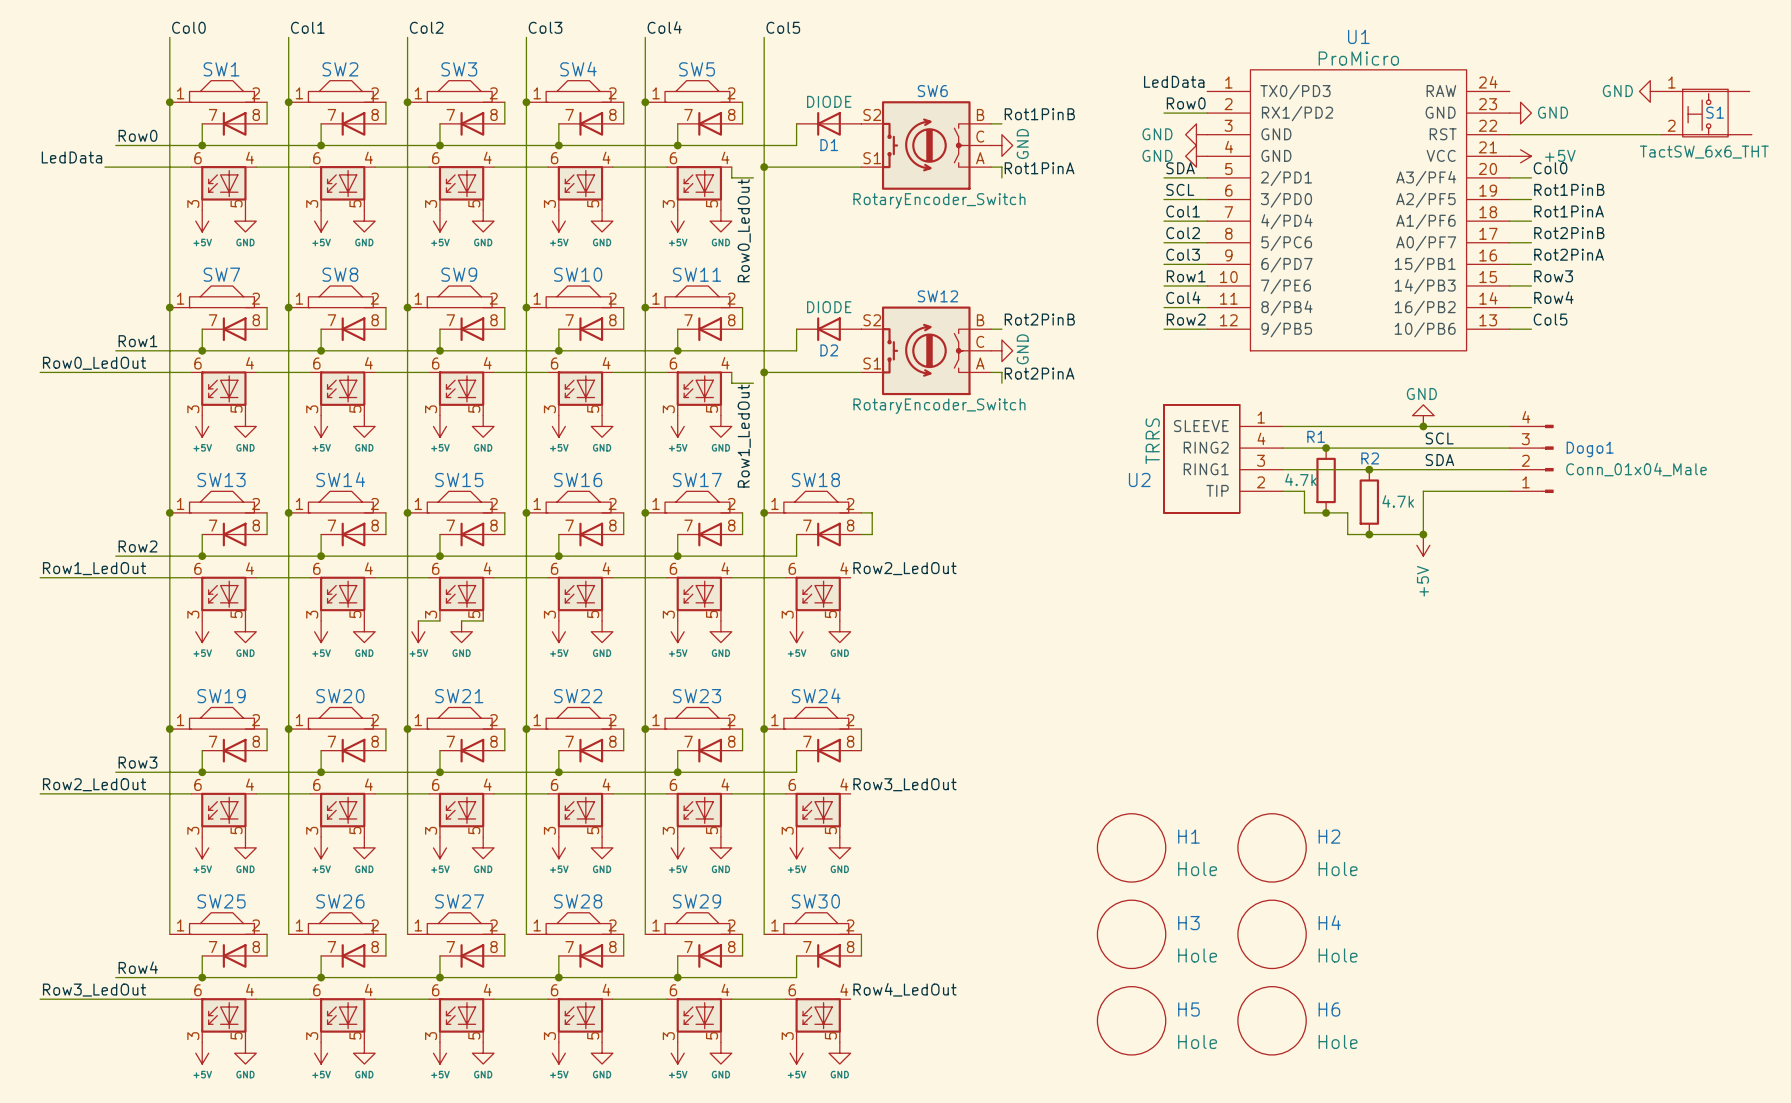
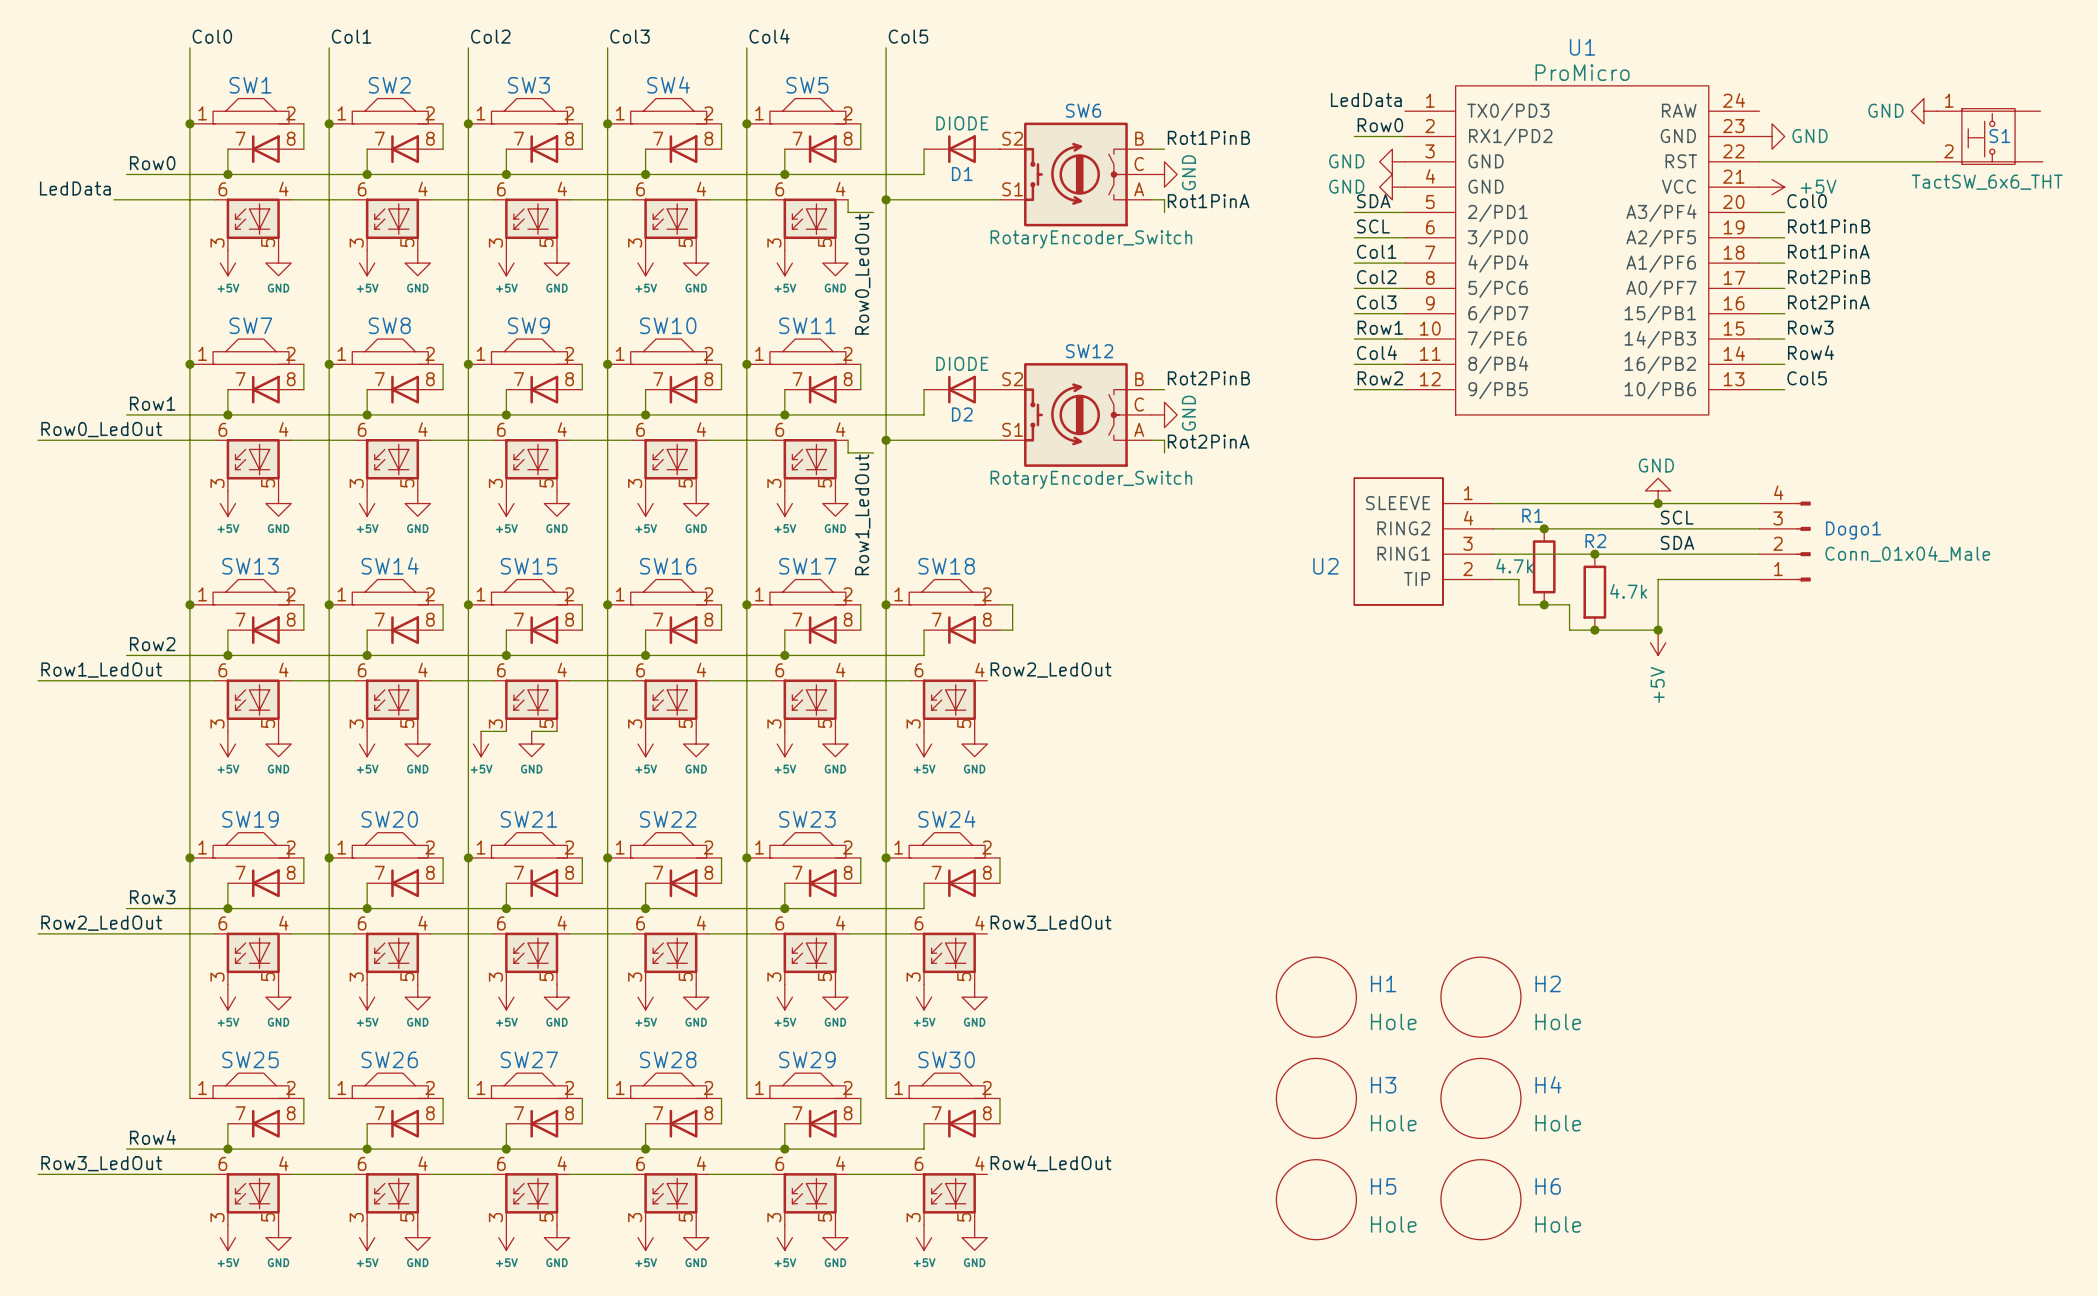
U2 value: TRRS (1152, 441) -> none

